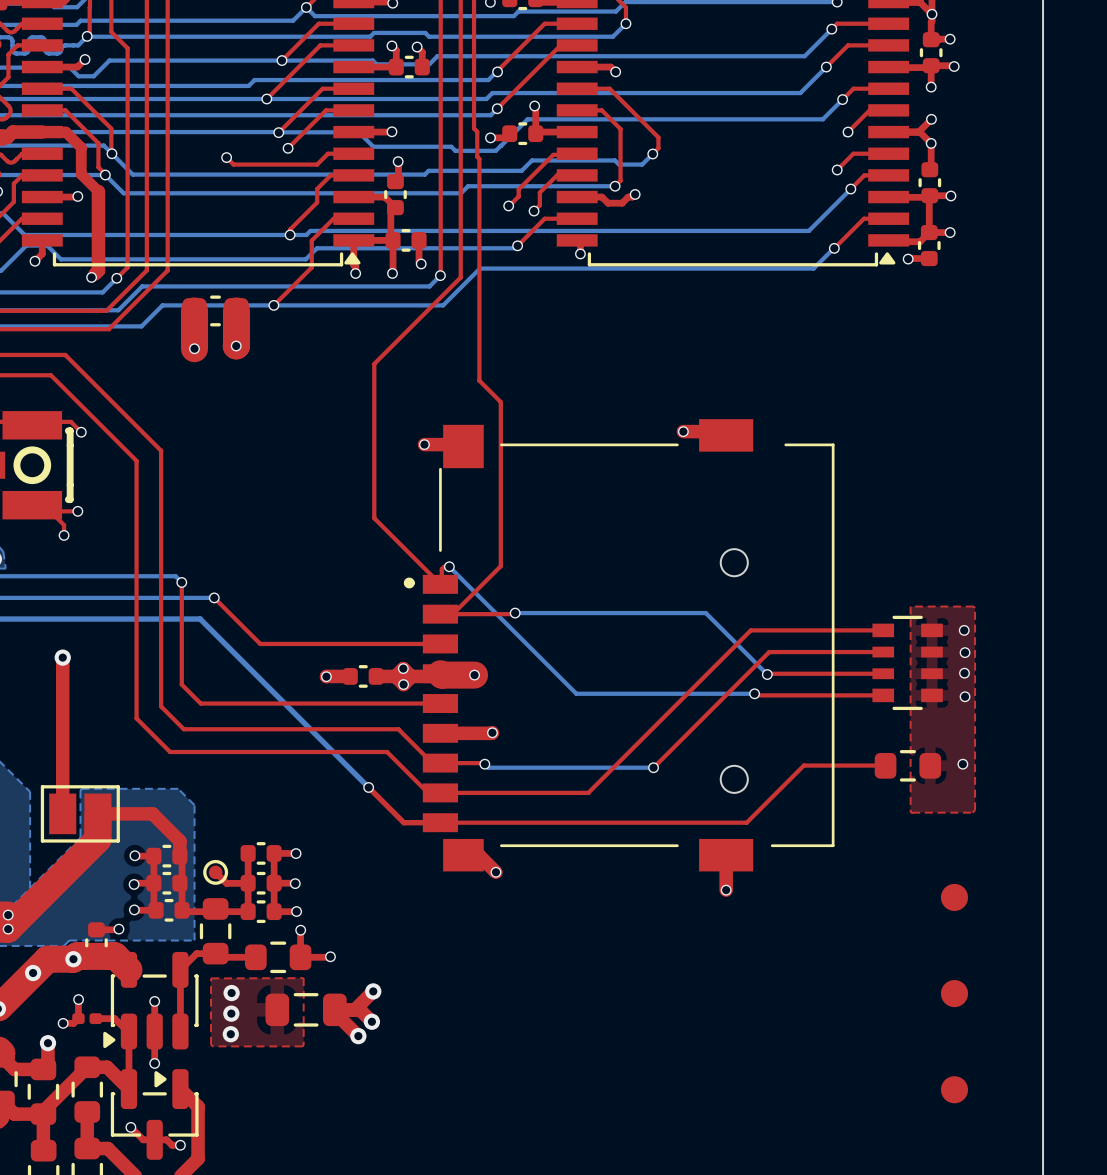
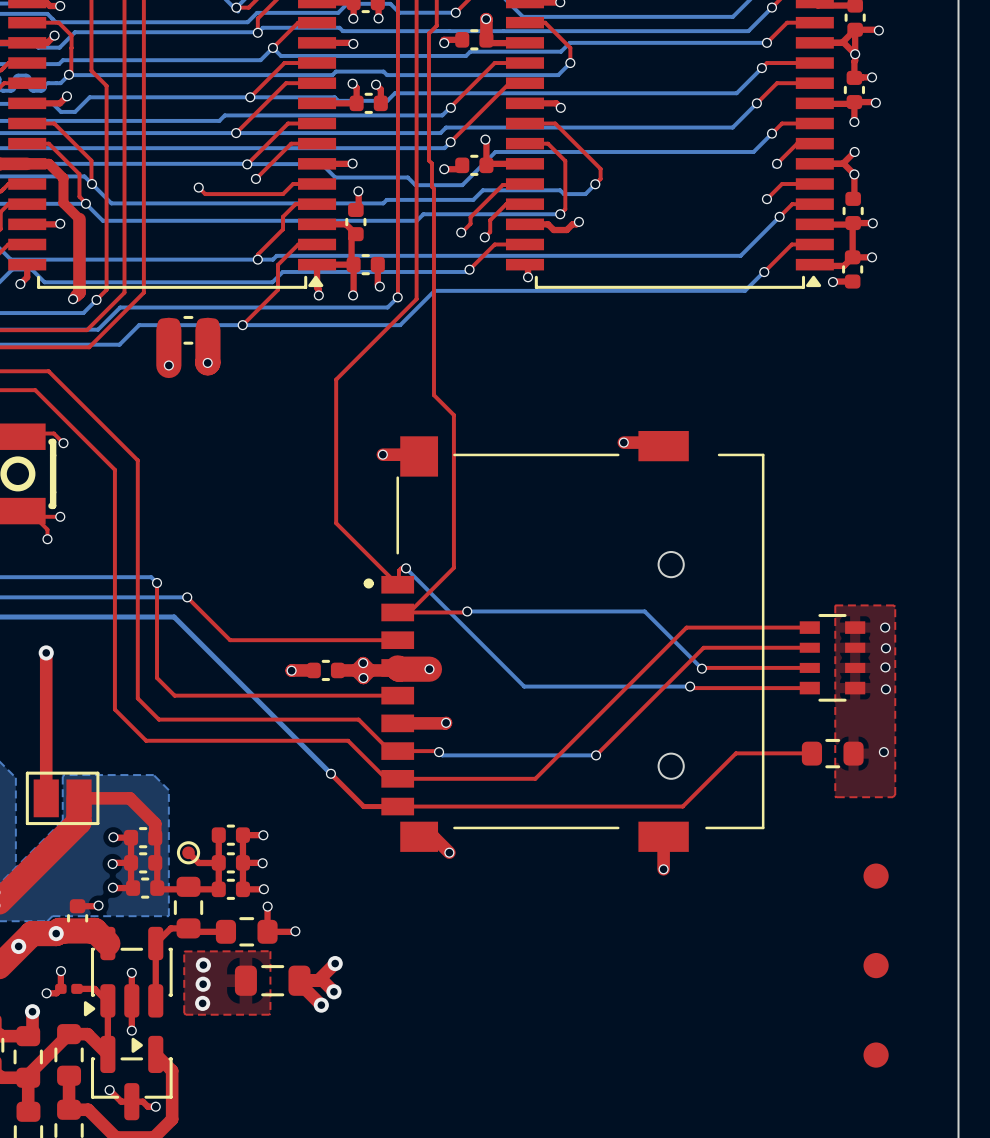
bottom track: (545, 119) (527, 119) (501, 145) -> (495, 151) (462, 185) (415, 185) (411, 181)
bottom track: (500, 145) (495, 150) (455, 150) -> none

